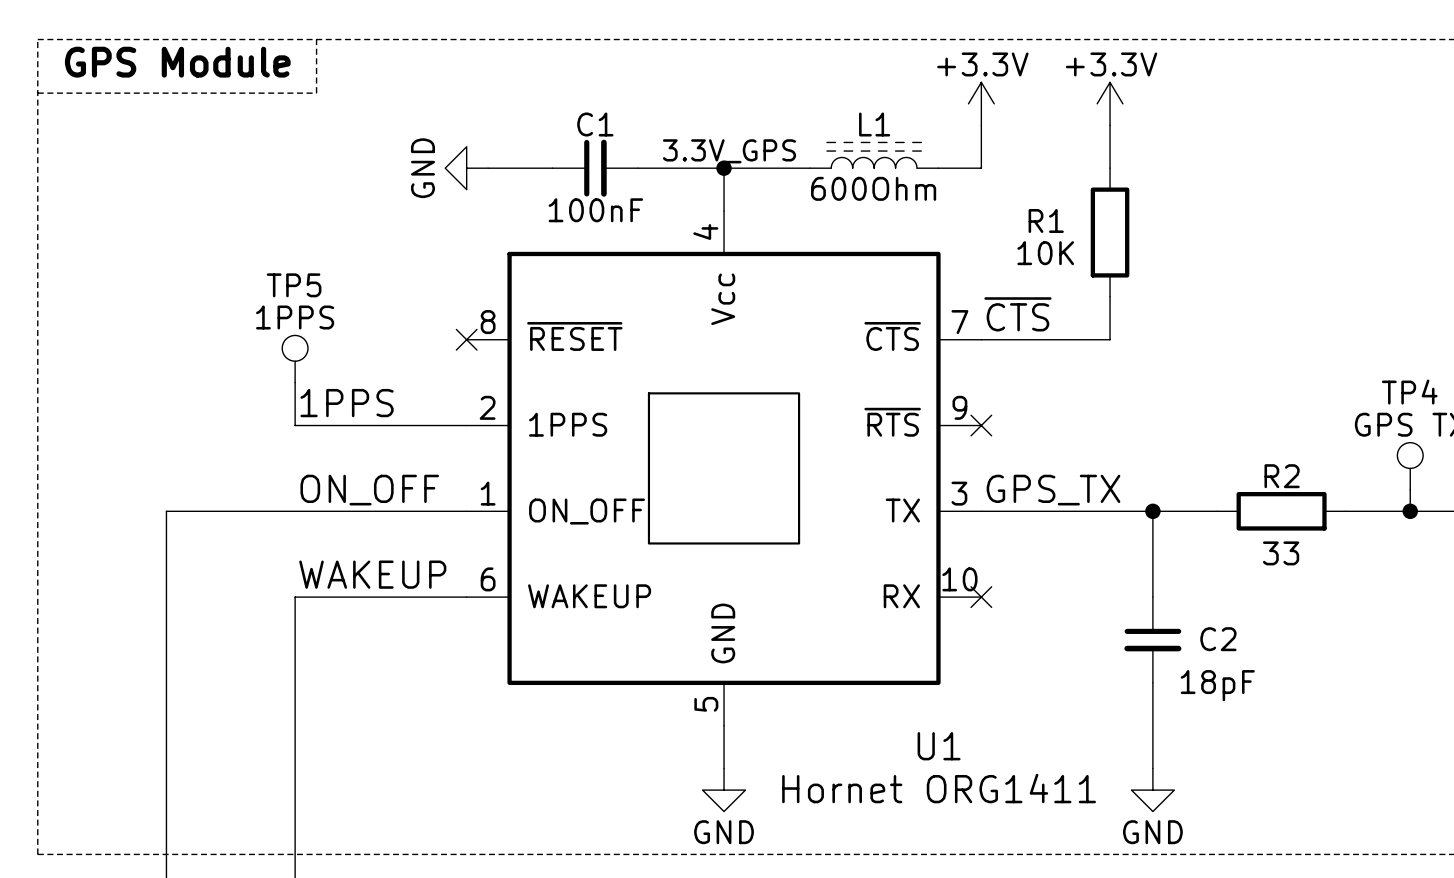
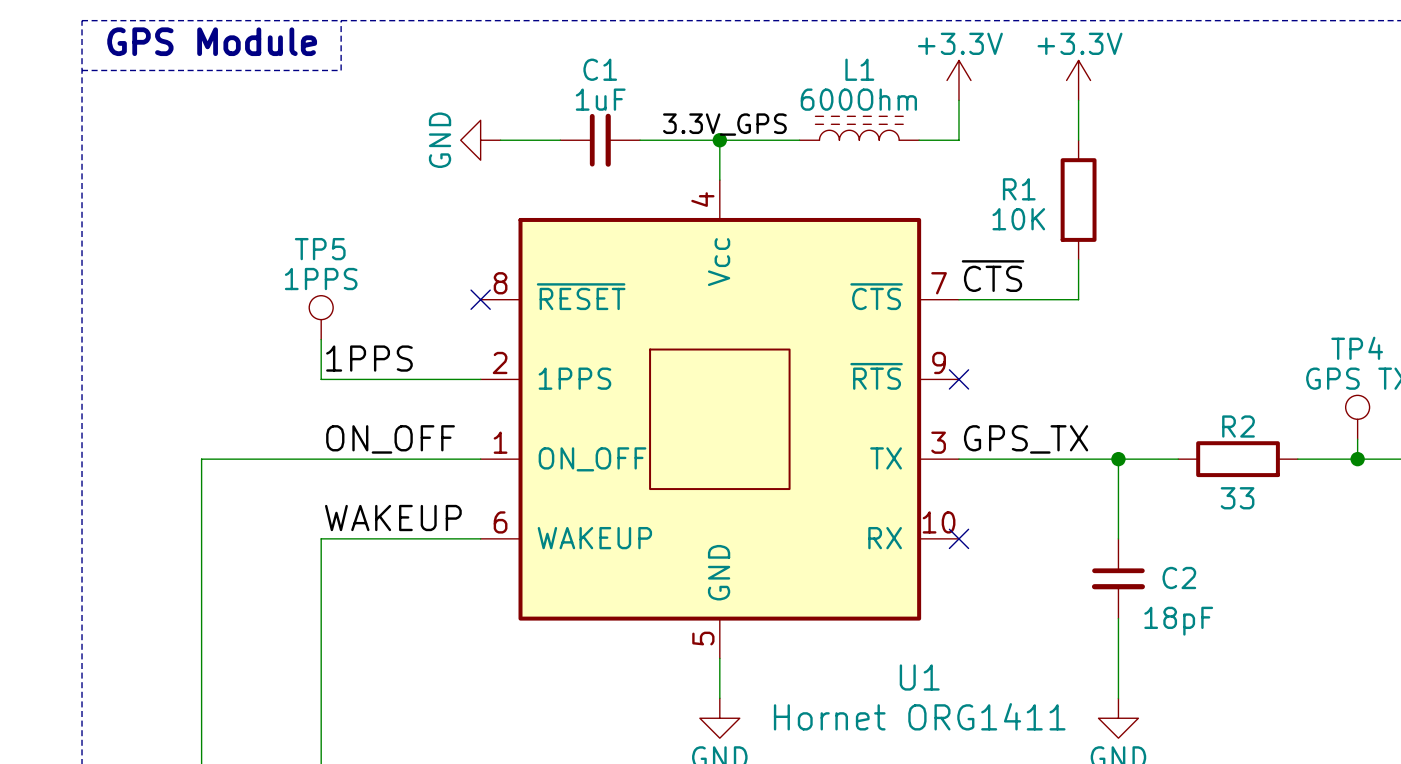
C1 name position: C1 (595, 124) -> C1 (600, 69)
L1 name position: L1 (874, 124) -> L1 (859, 69)
L1 value position: 600Ohm (873, 188) -> 600Ohm (858, 99)
C1 value: 100nF (595, 210) -> 1uF (600, 99)

